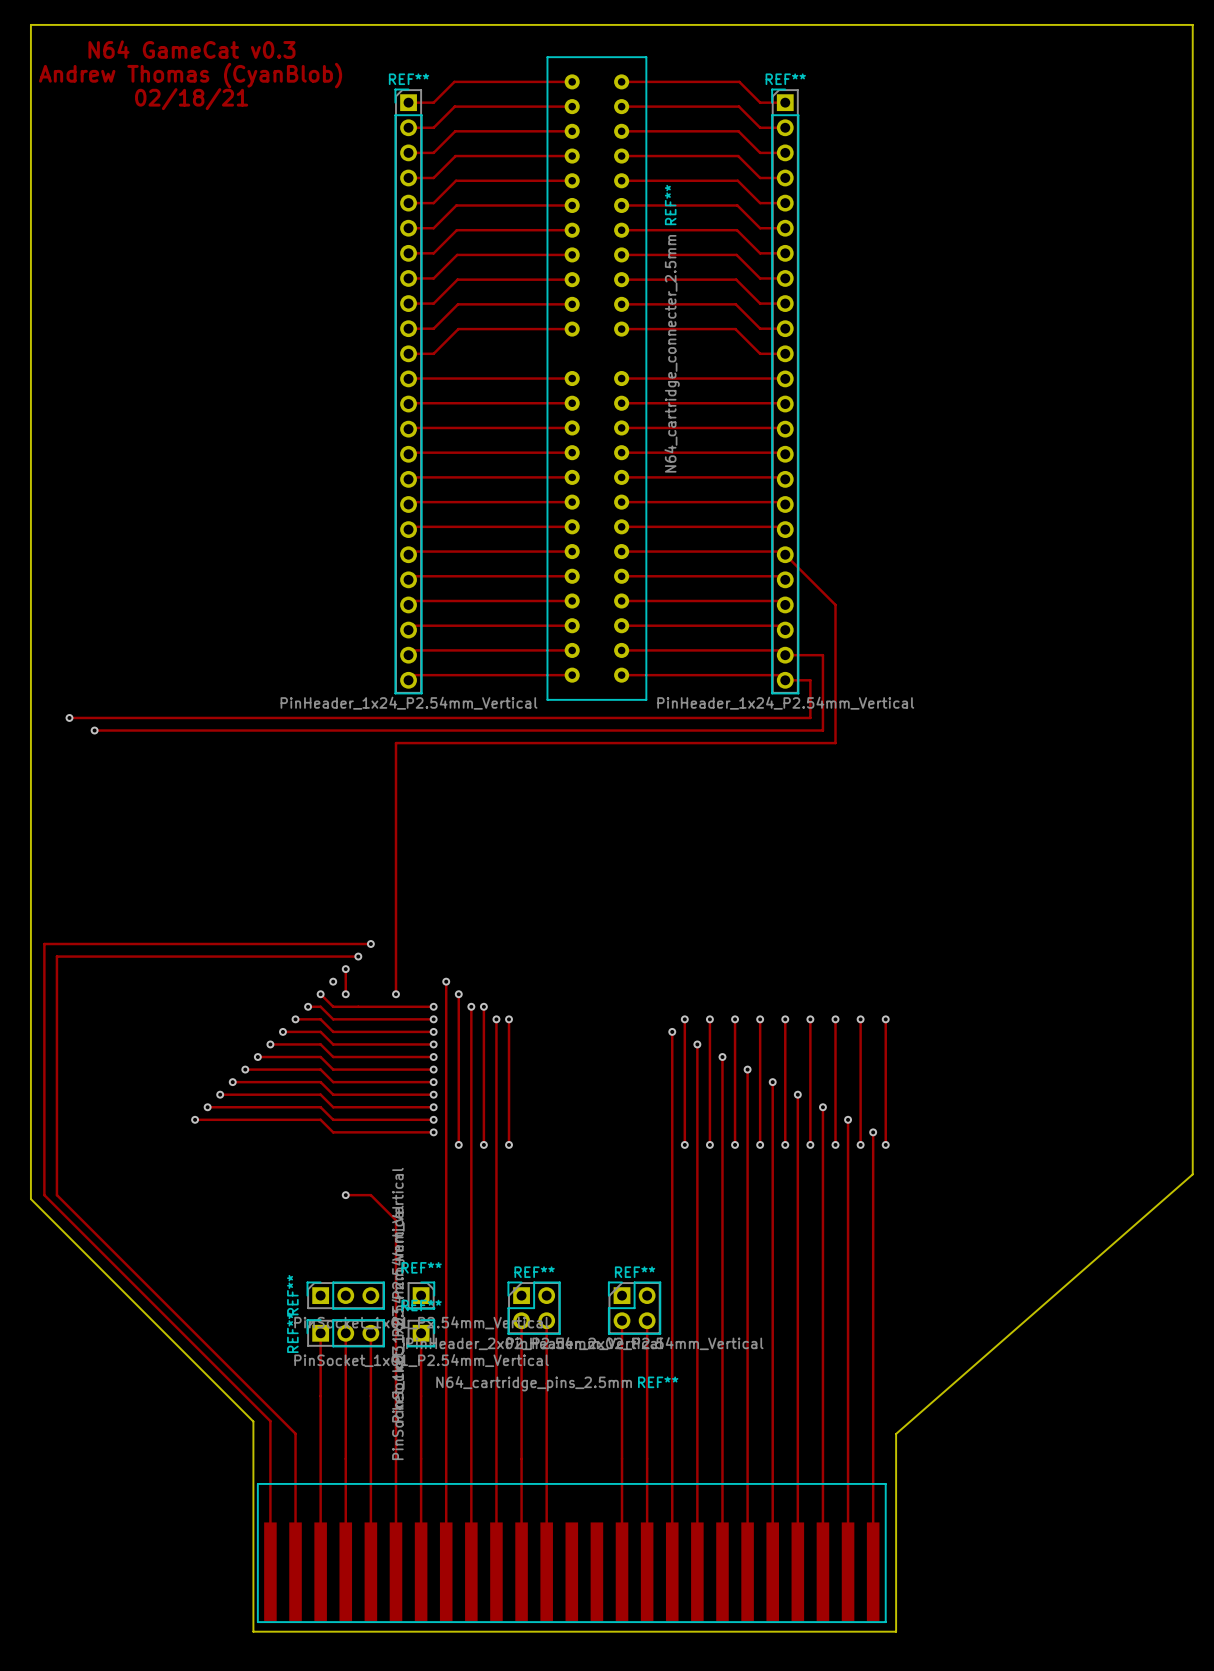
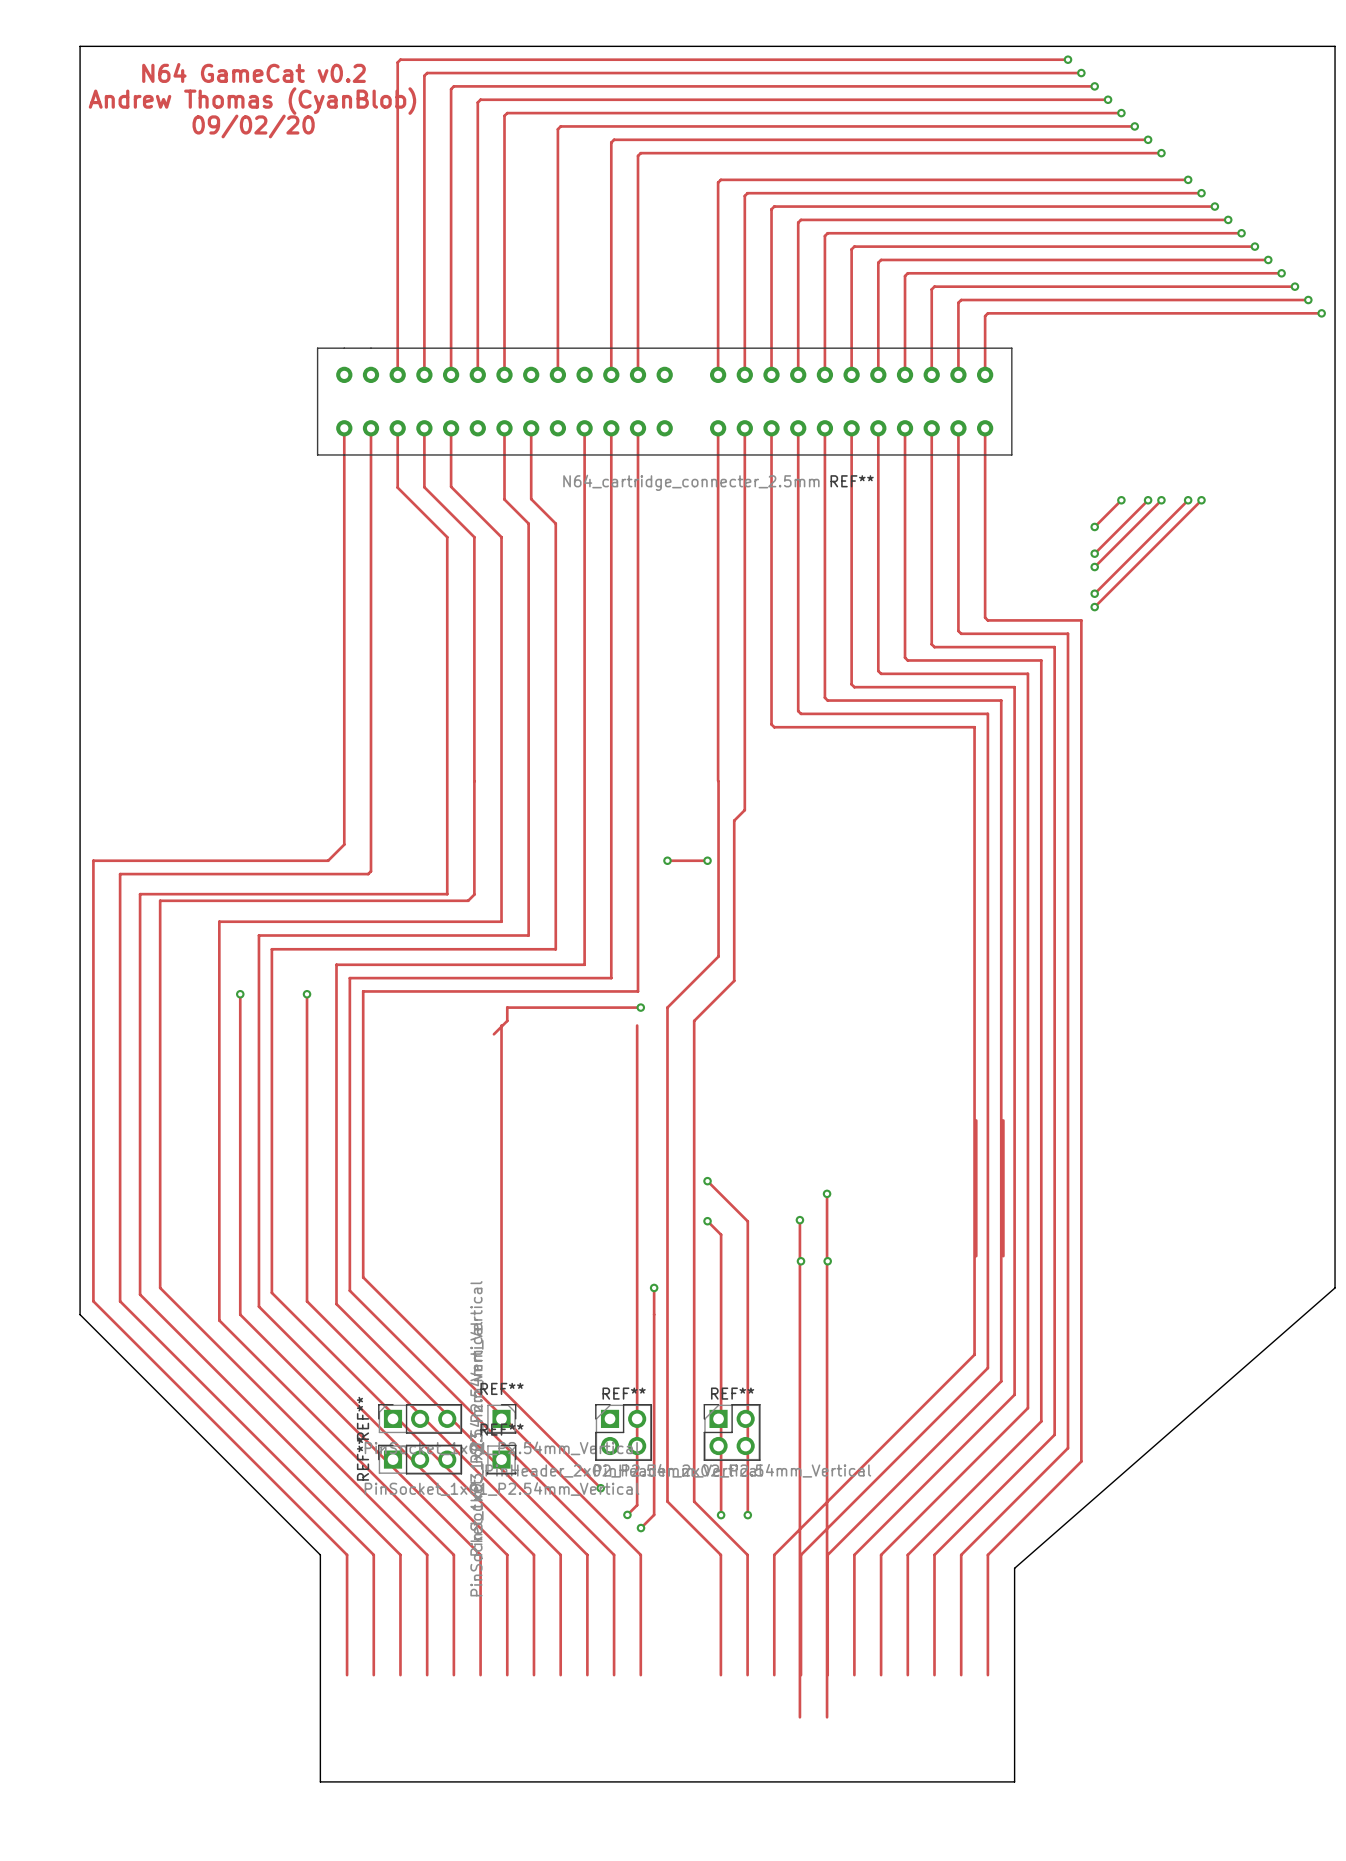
track: none -> (1068, 59) (400, 59) (397, 62) (397, 374)
via: none -> (1068, 59)
text: N64 GameCat v0.3 (191, 49) -> N64 GameCat v0.2 (254, 72)
track: none -> (1081, 73) (427, 73) (424, 75) (424, 374)
via: none -> (1081, 73)
track: none -> (1094, 86) (453, 86) (451, 89) (451, 374)
via: none -> (1094, 86)
track: none -> (1108, 99) (480, 99) (477, 102) (477, 374)
via: none -> (1108, 99)
track: (572, 81) (454, 81) (433, 102) (408, 102) -> none
track: (621, 81) (739, 81) (760, 102) (785, 102) -> none
track: none -> (1121, 113) (507, 113) (504, 115) (504, 374)
via: none -> (1121, 113)
text: 02/18/21 (191, 99) -> 09/02/20 (253, 126)
track: none -> (1134, 126) (560, 126) (557, 129) (557, 374)
via: none -> (1134, 126)
track: (572, 106) (454, 106) (433, 127) (408, 127) -> none
track: (621, 106) (738, 106) (760, 127) (785, 127) -> none
track: none -> (1148, 139) (614, 139) (611, 142) (611, 374)
via: none -> (1148, 139)
track: none -> (1161, 153) (640, 153) (638, 155) (638, 374)
via: none -> (1161, 153)
track: (572, 131) (455, 131) (433, 152) (408, 152) -> none
track: (621, 131) (738, 131) (760, 152) (785, 152) -> none
via: none -> (1188, 179)
track: (572, 156) (455, 156) (433, 178) (408, 178) -> none
track: (621, 156) (738, 156) (760, 178) (785, 178) -> none
track: none -> (1201, 193) (747, 193) (744, 195) (744, 374)
via: none -> (1201, 193)
track: none -> (1214, 206) (774, 206) (771, 209) (771, 374)
via: none -> (1214, 206)
track: (572, 180) (456, 180) (433, 203) (408, 203) -> none
track: (621, 180) (737, 180) (760, 203) (785, 203) -> none
track: none -> (1228, 219) (800, 219) (798, 222) (798, 374)
via: none -> (1228, 219)
track: none -> (1241, 233) (827, 233) (824, 236) (824, 374)
via: none -> (1241, 233)
track: (572, 205) (456, 205) (433, 228) (408, 228) -> none
track: (621, 205) (737, 205) (760, 228) (785, 228) -> none
track: none -> (1254, 246) (854, 246) (851, 249) (851, 374)
via: none -> (1254, 246)
track: none -> (1268, 259) (881, 259) (878, 262) (878, 374)
via: none -> (1268, 259)
track: (572, 230) (456, 230) (433, 253) (408, 253) -> none
track: (621, 230) (737, 230) (760, 253) (785, 253) -> none
track: none -> (1281, 273) (907, 273) (905, 276) (905, 374)
via: none -> (1281, 273)
track: none -> (1294, 286) (934, 286) (931, 289) (931, 374)
via: none -> (1294, 286)
track: (572, 254) (457, 254) (433, 278) (408, 278) -> none
track: (621, 254) (736, 254) (760, 278) (785, 278) -> none
track: none -> (1308, 300) (961, 300) (958, 302) (958, 374)
via: none -> (1308, 300)
track: none -> (1321, 313) (987, 313) (985, 316) (985, 374)
via: none -> (1321, 313)
track: (572, 279) (457, 279) (433, 303) (408, 303) -> none
track: (621, 279) (736, 279) (760, 303) (785, 303) -> none
track: (572, 304) (457, 304) (433, 328) (408, 328) -> none
track: (621, 304) (735, 304) (760, 328) (785, 328) -> none
track: (572, 329) (458, 329) (433, 353) (408, 353) -> none
track: (621, 329) (735, 329) (760, 353) (785, 353) -> (718, 374) (718, 182) (720, 179) (1188, 179)
track: none -> (344, 428) (344, 844) (328, 860) (93, 860) (93, 1301) (347, 1554) (347, 1675)
track: none -> (370, 428) (370, 871) (368, 874) (120, 874) (120, 1301) (373, 1554) (373, 1675)
track: none -> (397, 428) (397, 487) (447, 537) (447, 894) (140, 894) (140, 1294) (400, 1554) (400, 1675)
track: none -> (451, 428) (451, 486) (501, 537) (501, 921) (219, 921) (219, 1320) (453, 1554) (453, 1675)
track: none -> (504, 428) (504, 499) (528, 523) (528, 935) (258, 935) (258, 1306) (507, 1554) (507, 1675)
track: none -> (531, 428) (531, 499) (555, 523) (555, 949) (271, 949) (271, 1292) (533, 1554) (533, 1675)
track: none -> (584, 428) (584, 964) (336, 964) (336, 1304) (587, 1554) (587, 1675)
track: none -> (611, 428) (611, 978) (349, 978) (349, 1290) (614, 1554) (614, 1675)
track: none -> (638, 428) (638, 991) (363, 991) (363, 1277) (640, 1554) (640, 1675)
track: (572, 378) (408, 378) -> none
REF** rotation: 0° (596, 378) -> 90° clockwise (664, 401)
track: (621, 378) (785, 378) -> (718, 428) (718, 780)
track: none -> (744, 428) (744, 810) (734, 820) (734, 980) (694, 1020) (694, 1501) (747, 1554) (747, 1675)
track: none -> (771, 428) (771, 724) (774, 727) (974, 727) (974, 1354) (774, 1554) (774, 1675)
track: none -> (798, 428) (798, 711) (800, 713) (987, 713) (987, 1368) (800, 1554) (800, 1675)
track: none -> (824, 428) (824, 697) (827, 700) (1001, 700) (1001, 1381) (827, 1554) (827, 1675)
track: none -> (851, 428) (851, 684) (854, 687) (1014, 687) (1014, 1394) (854, 1554) (854, 1675)
track: none -> (878, 428) (878, 671) (881, 673) (1027, 673) (1027, 1408) (881, 1554) (881, 1675)
track: none -> (905, 428) (905, 657) (907, 660) (1041, 660) (1041, 1421) (907, 1554) (907, 1675)
track: none -> (931, 428) (931, 644) (934, 647) (1054, 647) (1054, 1434) (934, 1554) (934, 1675)
track: none -> (958, 428) (958, 631) (961, 633) (1068, 633) (1068, 1448) (961, 1554) (961, 1675)
track: none -> (985, 428) (985, 617) (987, 620) (1081, 620) (1081, 1461) (987, 1554) (987, 1675)
REF**: PinHeader_1x24_P2.54mm_Vertical (408, 391) -> none
REF**: PinHeader_1x24_P2.54mm_Vertical (785, 391) -> none
track: (572, 403) (408, 404) -> none
track: (621, 403) (785, 404) -> none
track: (572, 427) (408, 429) -> none
track: (621, 427) (785, 429) -> none
track: none -> (1121, 500) (1094, 526)
via: none -> (1121, 500)
track: none -> (1148, 500) (1094, 553)
via: none -> (1148, 500)
track: none -> (1161, 500) (1094, 567)
via: none -> (1161, 500)
track: none -> (1188, 500) (1094, 593)
via: none -> (1188, 500)
track: none -> (1201, 500) (1094, 607)
via: none -> (1201, 500)
track: (572, 452) (410, 452) (408, 454) -> none
track: (621, 452) (783, 452) (785, 454) -> none
via: none -> (1094, 526)
track: (572, 477) (410, 477) (408, 479) -> none
track: (621, 477) (783, 477) (785, 479) -> none
via: none -> (1094, 553)
track: (572, 502) (410, 502) (408, 504) -> none
track: (621, 502) (782, 502) (785, 504) -> none
via: none -> (1094, 567)
track: (572, 526) (411, 526) (408, 529) -> none
track: (621, 526) (782, 526) (785, 529) -> none
via: none -> (1094, 593)
via: none -> (1094, 607)
track: (572, 551) (411, 551) (408, 554) -> none
track: (621, 551) (782, 551) (835, 604) (835, 743) (395, 743) -> (424, 428) (424, 487) (474, 537) (474, 822)
track: (572, 576) (412, 576) (408, 579) -> none
track: (621, 576) (781, 576) (785, 579) -> none
track: (572, 600) (412, 600) (408, 604) -> none
track: (621, 600) (781, 600) (785, 604) -> none
track: (572, 625) (412, 625) (408, 630) -> none
track: (621, 625) (780, 625) (785, 630) -> none
track: (572, 650) (413, 650) (408, 655) -> none
track: (621, 650) (780, 650) (785, 655) (822, 655) (822, 730) (94, 730) -> none
track: (572, 675) (413, 675) (408, 680) -> none
track: (621, 675) (780, 675) (785, 680) (810, 680) (810, 717) (69, 717) -> none
track: none -> (718, 781) (718, 956) (667, 1007) (667, 1501) (720, 1554) (720, 1675)
via: (69, 717) -> none
via: (94, 730) -> none
track: none -> (667, 860) (707, 860)
via: none -> (667, 860)
via: none -> (707, 860)
track: (395, 810) (395, 994) -> (474, 894) (468, 900) (160, 900) (160, 1287) (427, 1554) (427, 1675)
track: none -> (240, 994) (240, 1314) (480, 1554) (480, 1675)
via: none -> (240, 994)
track: none -> (307, 994) (307, 1301) (560, 1554) (560, 1675)
via: none -> (307, 994)
track: none -> (640, 1007) (507, 1007) (507, 1020) (493, 1034)
via: none -> (640, 1007)
track: none -> (501, 1025) (501, 1388) (600, 1488)
track: none -> (637, 1025) (637, 1446)
track: (370, 944) (44, 944) (44, 1195) (270, 1421) (270, 1571) -> none
via: (370, 944) -> none
track: (358, 956) (56, 956) (56, 1195) (295, 1433) (295, 1571) -> none
via: (358, 956) -> none
track: (345, 969) (345, 994) -> none
via: (345, 969) -> none
via: (333, 981) -> none
track: (446, 981) (446, 1571) -> none
via: (446, 981) -> none
track: (320, 994) (333, 1006) (433, 1006) -> none
via: (320, 994) -> none
via: (345, 994) -> none
via: (395, 994) -> none
track: (458, 994) (458, 1144) -> none
via: (458, 994) -> none
track: (308, 1006) (320, 1006) (333, 1019) (433, 1019) -> none
via: (308, 1006) -> none
via: (433, 1006) -> none
track: (471, 1006) (471, 1571) -> none
via: (471, 1006) -> none
track: (483, 1006) (483, 1144) -> none
via: (483, 1006) -> none
track: (295, 1019) (320, 1019) (333, 1031) (433, 1031) -> none
via: (295, 1019) -> none
via: (433, 1019) -> none
track: (496, 1019) (496, 1571) -> none
via: (496, 1019) -> none
track: (509, 1019) (509, 1144) -> none
via: (509, 1019) -> none
track: (684, 1019) (684, 1144) -> none
via: (684, 1019) -> none
track: (709, 1019) (709, 1144) -> none
via: (709, 1019) -> none
track: (735, 1019) (735, 1144) -> none
via: (735, 1019) -> none
track: (760, 1019) (760, 1144) -> none
via: (760, 1019) -> none
track: (785, 1019) (785, 1144) -> none
via: (785, 1019) -> none
track: (810, 1019) (810, 1144) -> none
via: (810, 1019) -> none
track: (835, 1019) (835, 1144) -> none
via: (835, 1019) -> none
via: (860, 1019) -> none
via: (885, 1019) -> none
track: (282, 1031) (320, 1031) (333, 1044) (433, 1044) -> none
via: (282, 1031) -> none
via: (433, 1031) -> none
track: (672, 1031) (672, 1571) -> none
via: (672, 1031) -> none
track: (270, 1044) (320, 1044) (333, 1057) (433, 1057) -> none
via: (270, 1044) -> none
via: (433, 1044) -> none
track: (697, 1044) (697, 1111) -> none
via: (697, 1044) -> none
track: (257, 1057) (320, 1057) (333, 1069) (433, 1069) -> none
via: (257, 1057) -> none
via: (433, 1057) -> none
track: (722, 1057) (722, 1087) -> none
via: (722, 1057) -> none
track: (245, 1069) (320, 1069) (333, 1082) (433, 1082) -> none
via: (245, 1069) -> none
via: (433, 1069) -> none
track: (747, 1069) (747, 1571) -> none
via: (747, 1069) -> none
track: none -> (707, 1181) (747, 1221) (747, 1515)
via: none -> (707, 1181)
track: (232, 1082) (320, 1082) (333, 1094) (433, 1094) -> none
via: (232, 1082) -> none
via: (433, 1082) -> none
track: (772, 1082) (772, 1571) -> none
via: (772, 1082) -> none
via: none -> (827, 1193)
track: (220, 1094) (320, 1094) (333, 1107) (433, 1107) -> none
via: (220, 1094) -> none
via: (433, 1094) -> none
track: (797, 1094) (797, 1571) -> none
via: (797, 1094) -> none
track: (207, 1107) (320, 1107) (333, 1119) (433, 1119) -> none
via: (207, 1107) -> none
via: (433, 1107) -> none
track: (822, 1107) (822, 1571) -> none
via: (822, 1107) -> none
via: none -> (799, 1220)
track: none -> (707, 1221) (721, 1234) (721, 1515)
via: none -> (707, 1221)
track: (195, 1119) (320, 1119) (333, 1132) (433, 1132) -> none
via: (195, 1119) -> none
via: (433, 1119) -> none
track: (848, 1119) (848, 1571) -> none
via: (848, 1119) -> none
via: (433, 1132) -> none
track: (873, 1132) (873, 1571) -> none
via: (873, 1132) -> none
via: (458, 1144) -> none
via: (483, 1144) -> none
via: (509, 1144) -> none
via: (684, 1144) -> none
via: (709, 1144) -> none
via: (735, 1144) -> none
via: (760, 1144) -> none
via: (785, 1144) -> none
via: (810, 1144) -> none
via: (835, 1144) -> none
via: (860, 1144) -> none
via: (885, 1144) -> none
via: none -> (800, 1261)
via: none -> (827, 1261)
track: none -> (654, 1287) (654, 1514) (641, 1528)
via: none -> (654, 1287)
track: (345, 1195) (370, 1195) (395, 1220) (395, 1571) -> none
via: (345, 1195) -> none
track: (521, 1320) (521, 1571) -> none
track: (622, 1320) (622, 1571) -> none
track: (647, 1320) (647, 1571) -> none
track: (320, 1333) (320, 1571) -> none
track: (345, 1333) (345, 1571) -> none
track: (370, 1333) (370, 1571) -> none
track: (421, 1333) (421, 1571) -> none
via: none -> (600, 1488)
track: (546, 1375) (546, 1571) -> (637, 1505) (627, 1514)
via: none -> (627, 1514)
via: none -> (721, 1515)
via: none -> (747, 1515)
via: none -> (641, 1528)
REF**: N64_cartridge_pins_2.5mm (571, 1553) -> none

